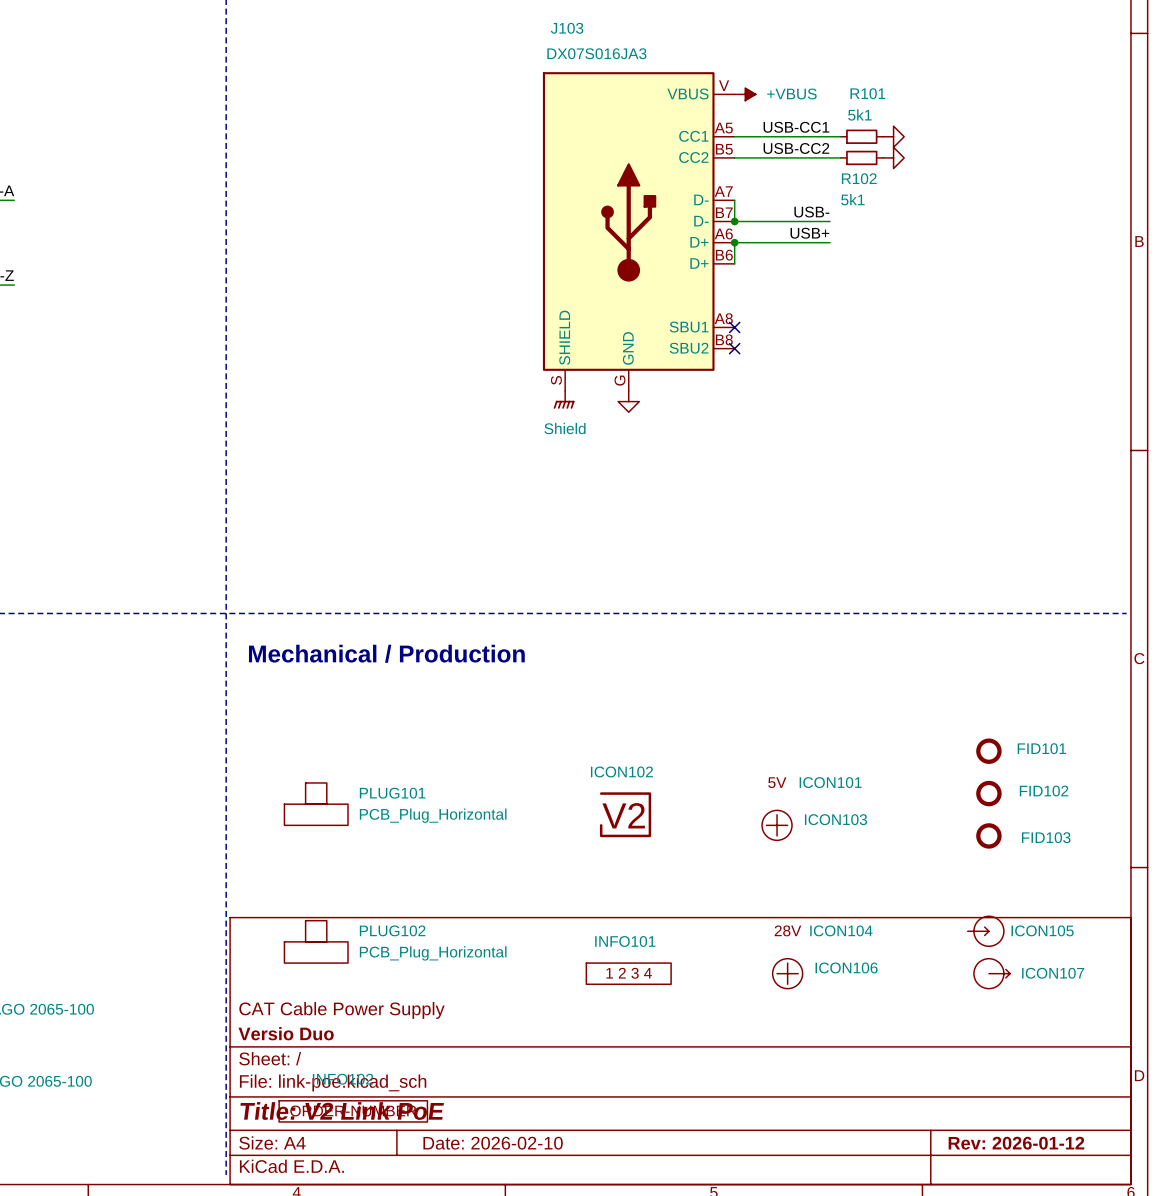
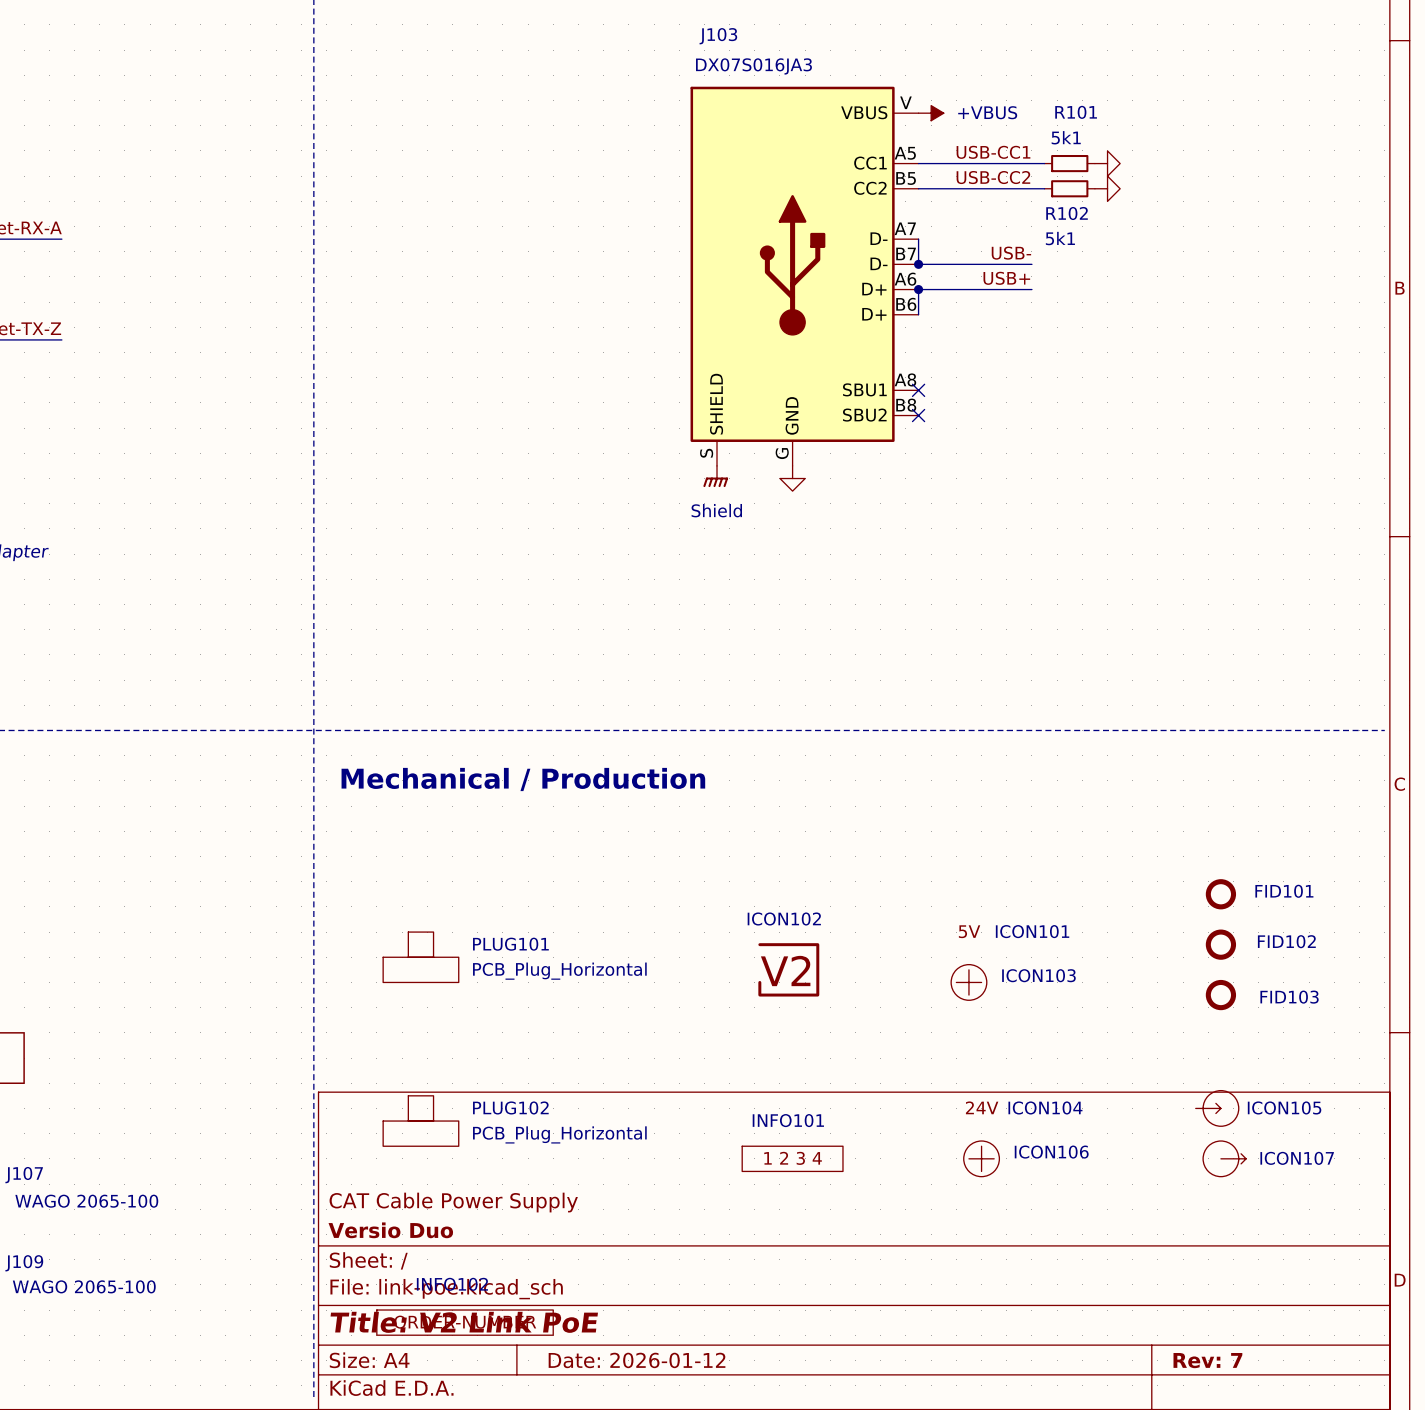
ICON104 text: 28V (787, 930) -> 24V (982, 1107)
title block: Date: 2026-02-10 (493, 1143) -> Date: 2026-01-12 (637, 1360)
title block: Rev: 2026-01-12 (1016, 1143) -> Rev: 7 (1207, 1360)

